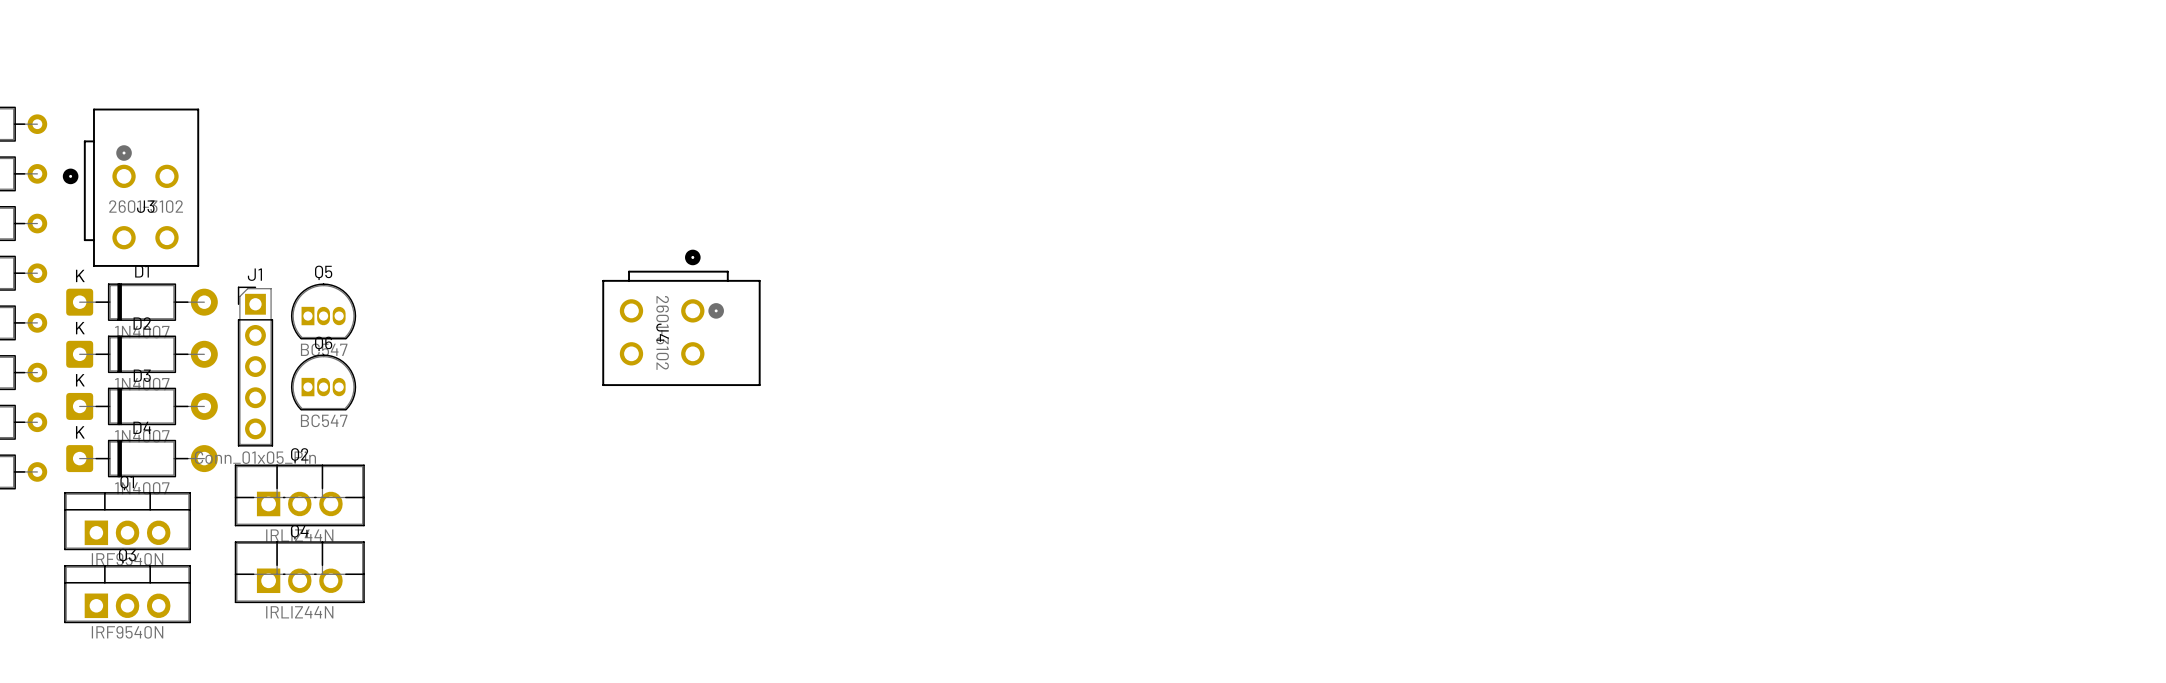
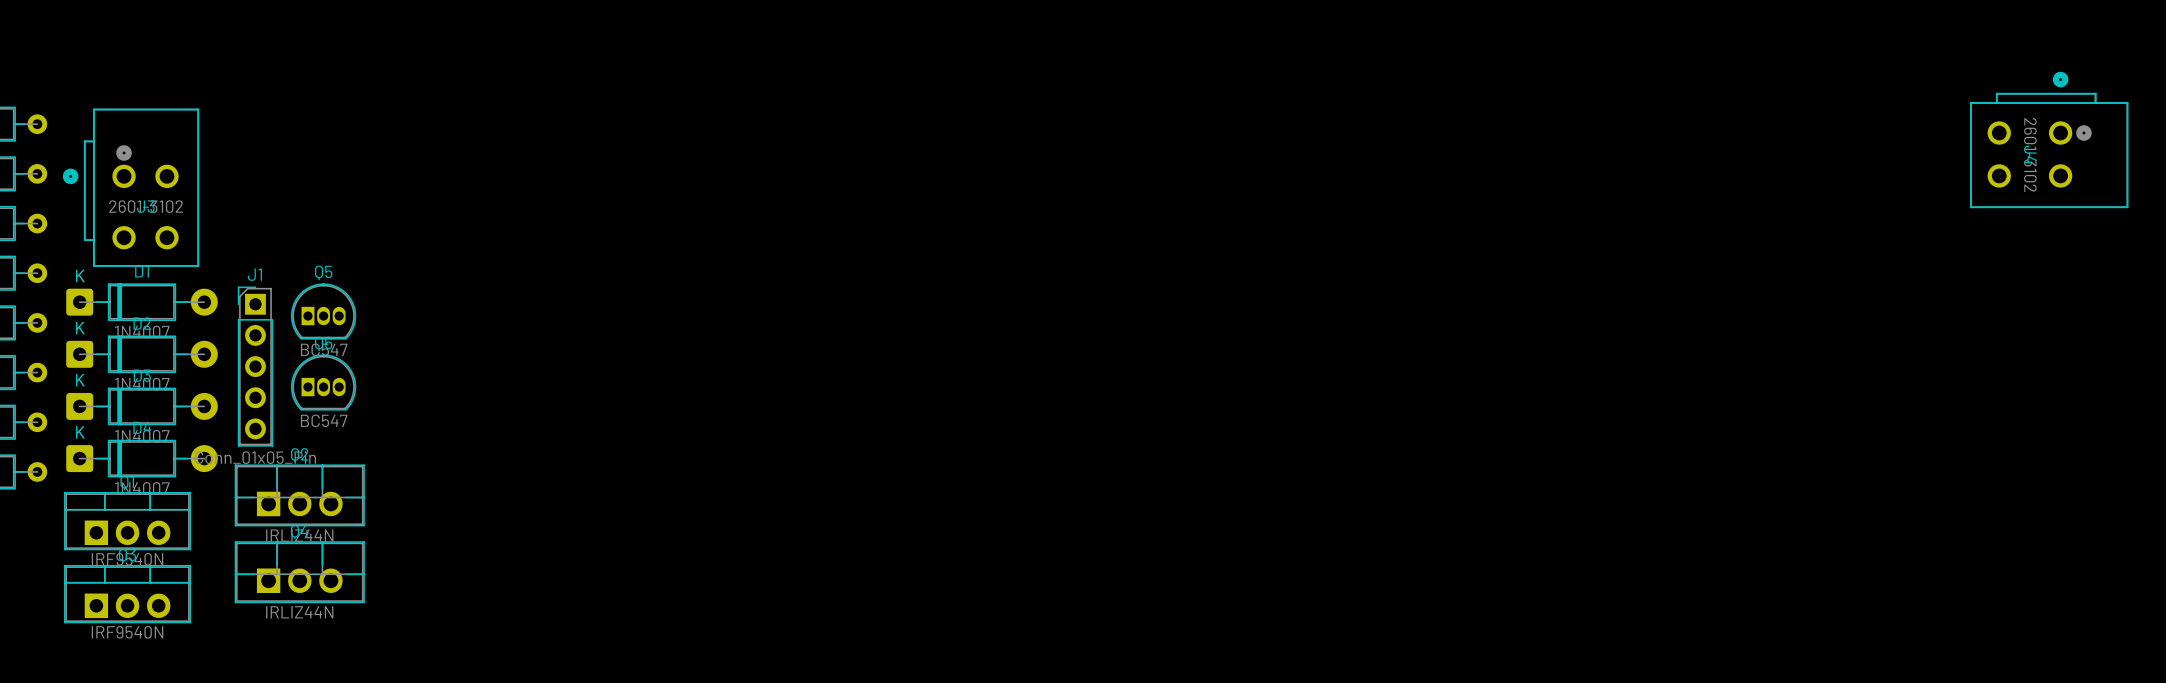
J4 position: (681, 317) -> (2049, 139)

